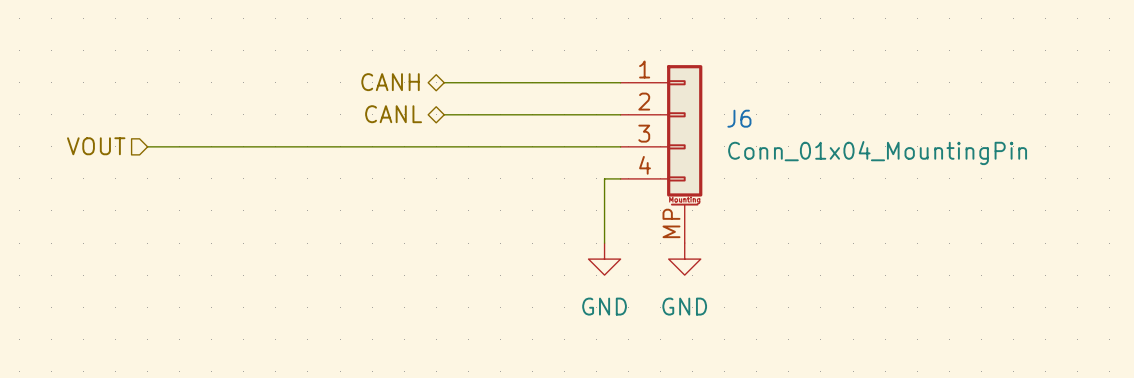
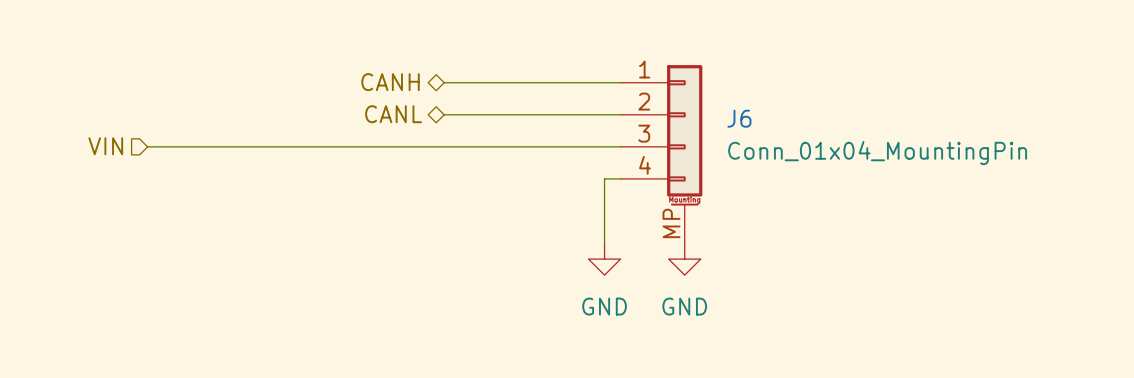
hierarchical label: VOUT (96, 146) -> VIN (105, 146)

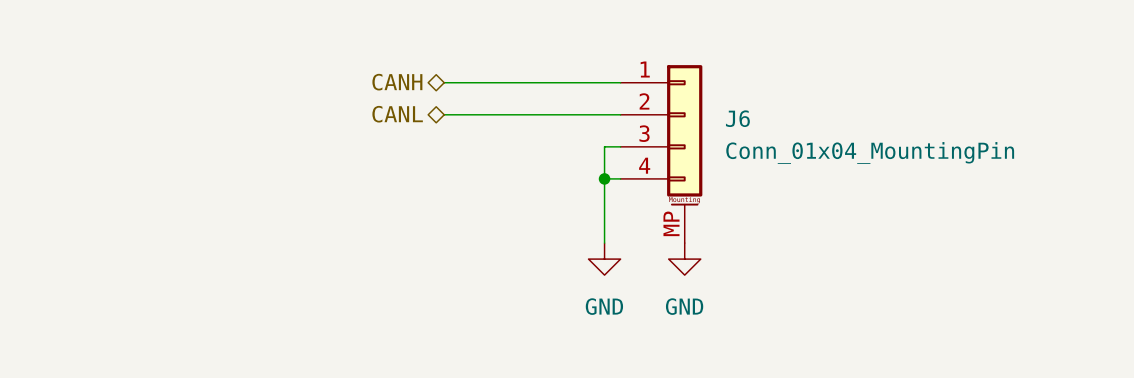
hierarchical label: VIN (105, 146) -> none
wire: (147, 146) (604, 146) -> (604, 178) (604, 146)
junction: none -> (604, 178)

